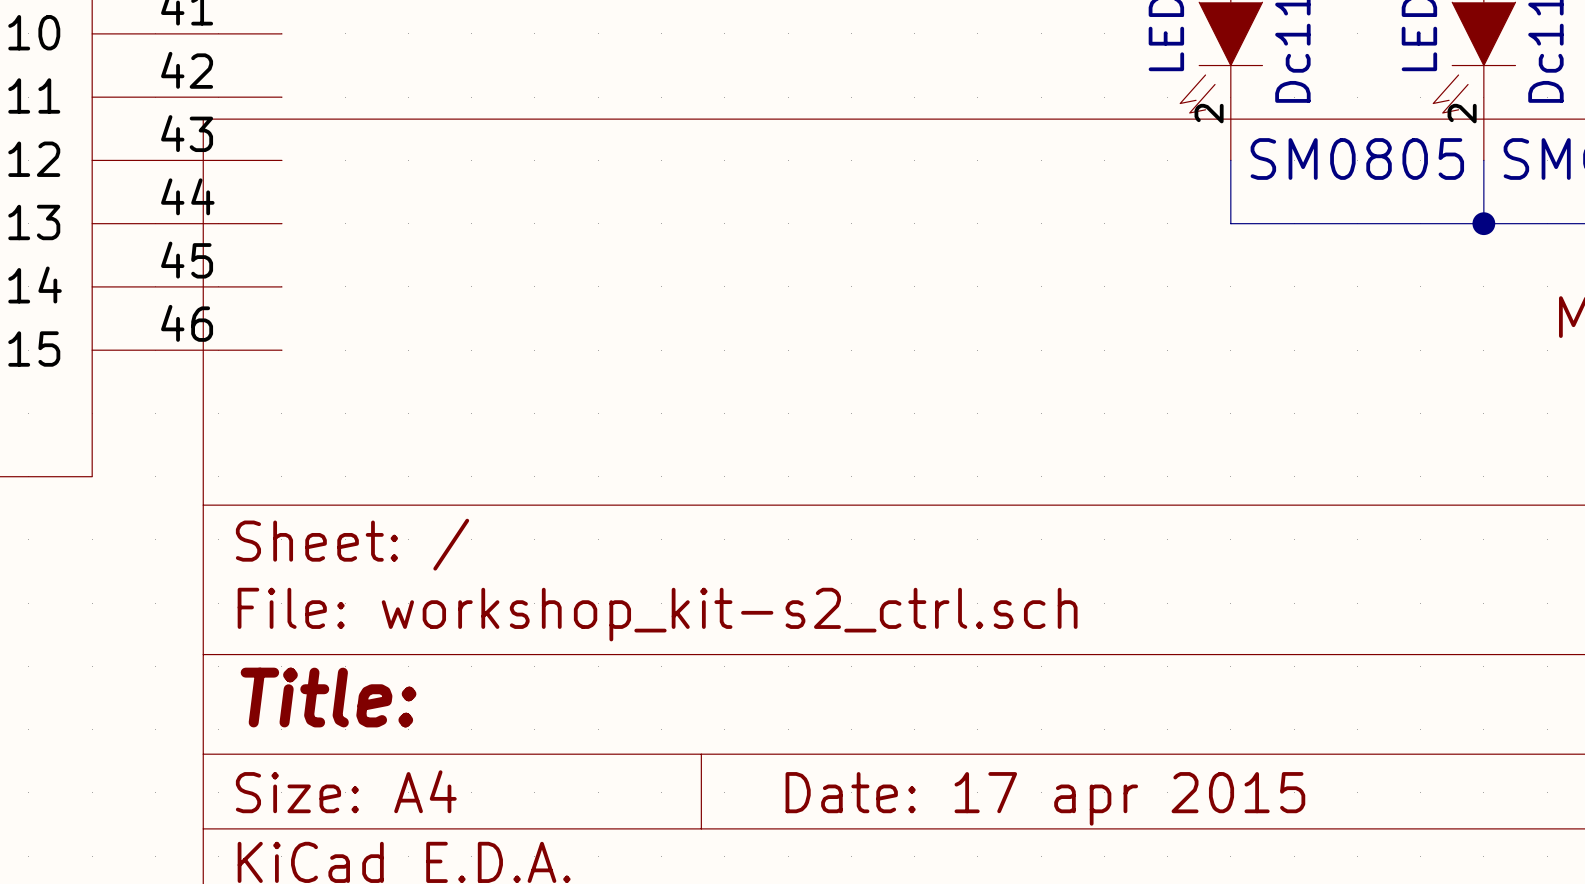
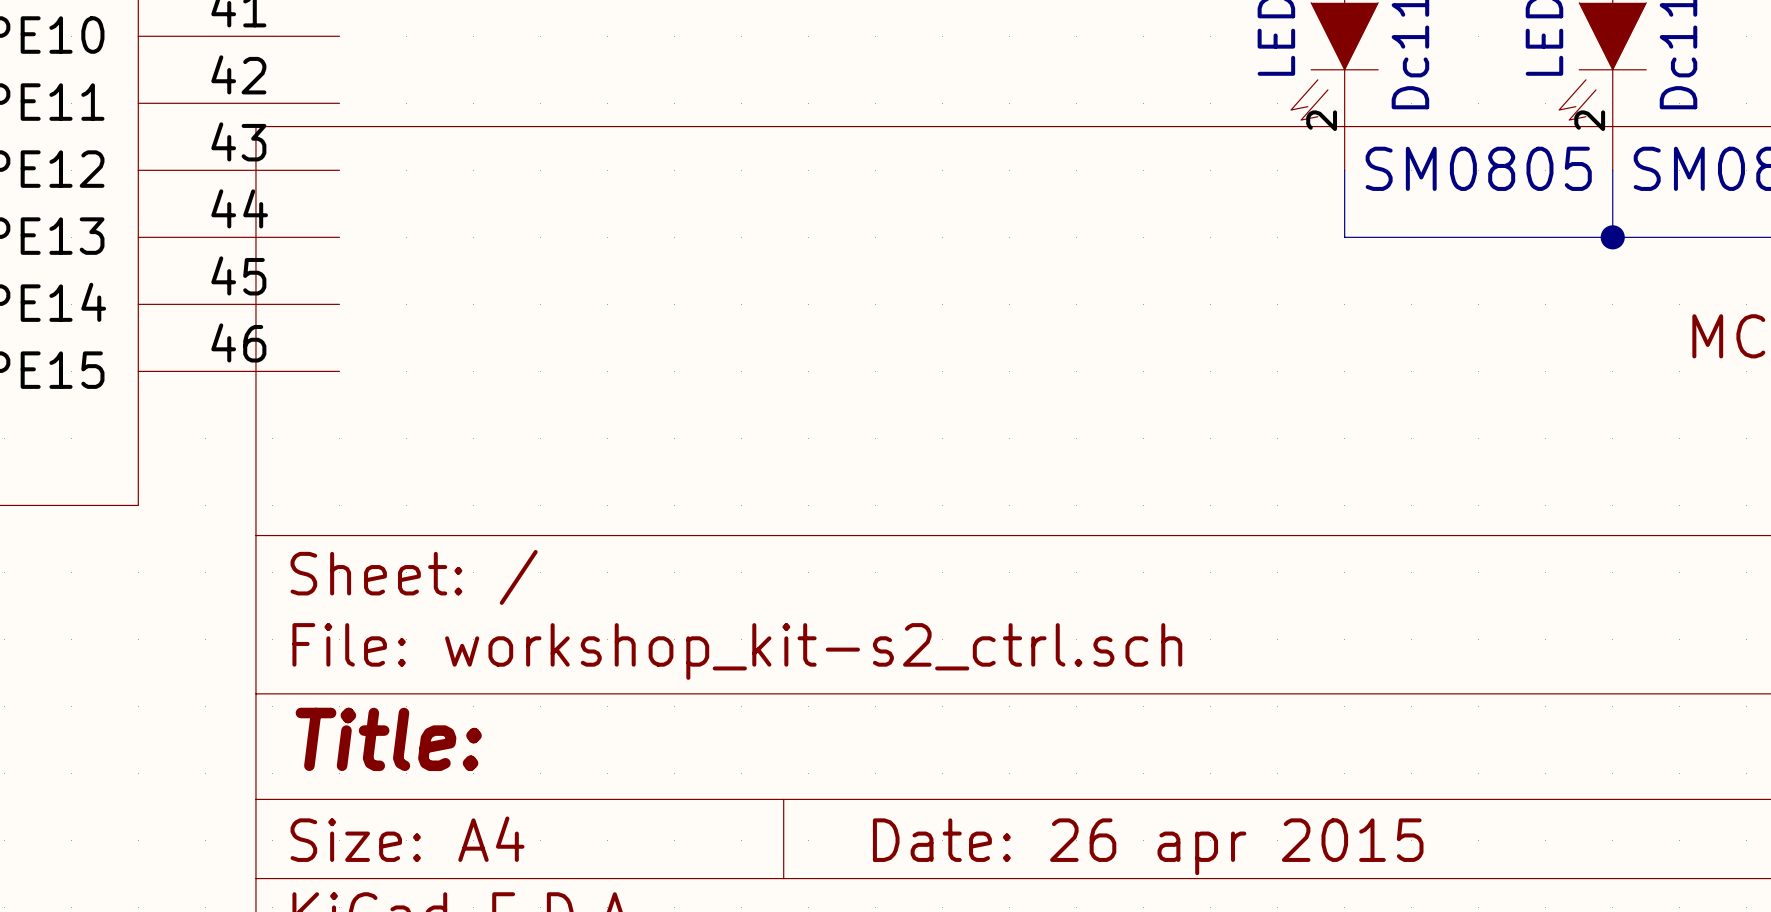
title block: Date: 17 apr 2015 (1045, 798) -> Date: 26 apr 2015 (1148, 846)

